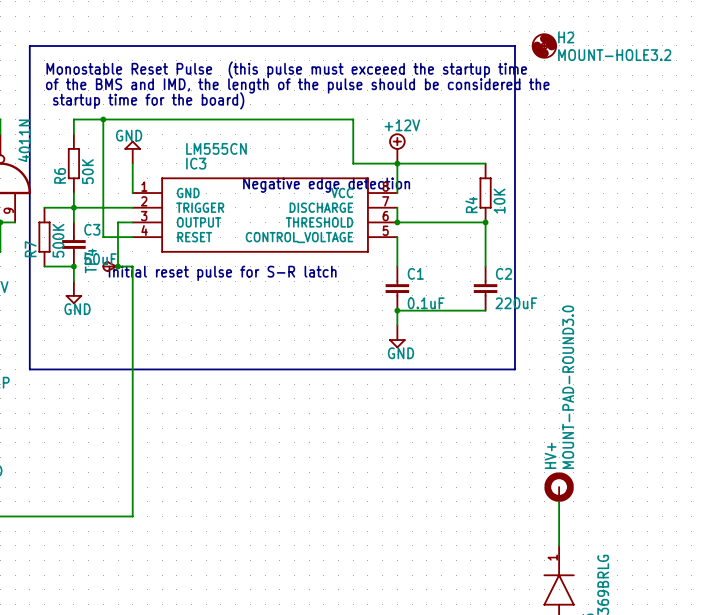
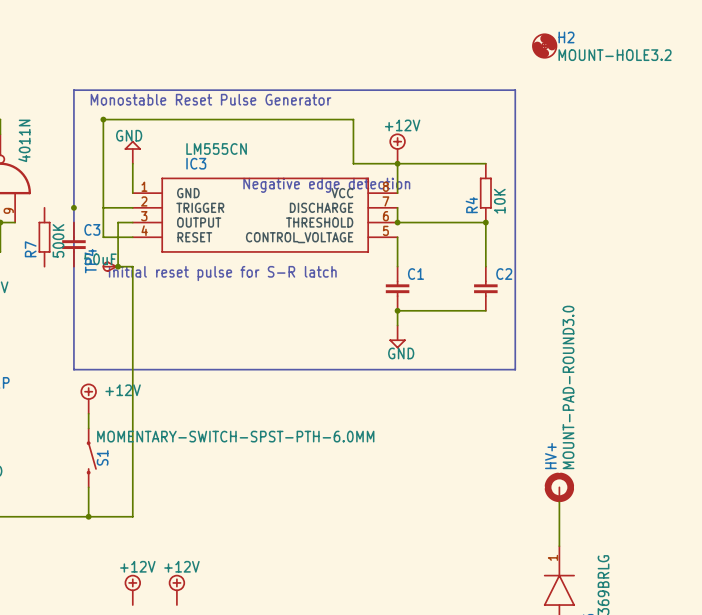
text: Monostable Reset Pulse (this pulse must exceeed the startup time (286, 70) -> none
text: of the BMS and IMD, the length of the pulse should be considered the (297, 85) -> none
line: (514, 90) (514, 45) (29, 45) (29, 369) (73, 369) -> (515, 90) (73, 90) (73, 369)
text: none -> Monostable Reset Pulse Generator (211, 99)
text: startup time for the board) (148, 100) -> none
wire: (103, 119) (73, 119) (73, 134) -> none
R6: 50K (73, 163) -> none
wire: (44, 207) (103, 207) -> none
wire: (44, 266) (73, 266) (73, 281) -> none
junction: (73, 266) -> none
power symbol: GND (73, 292) -> none
C1 value: 0.1uF (426, 303) -> none
C2 value: 220uF (516, 303) -> none
power symbol: none -> +12V (88, 398)
wire: none -> (88, 413) (88, 428)
S1: none -> MOMENTARY-SWITCH-SPST-PTH-6.0MM (91, 457)
wire: none -> (88, 487) (88, 516)
junction: none -> (88, 516)
power symbol: none -> +12V (132, 589)
power symbol: none -> +12V (176, 589)

